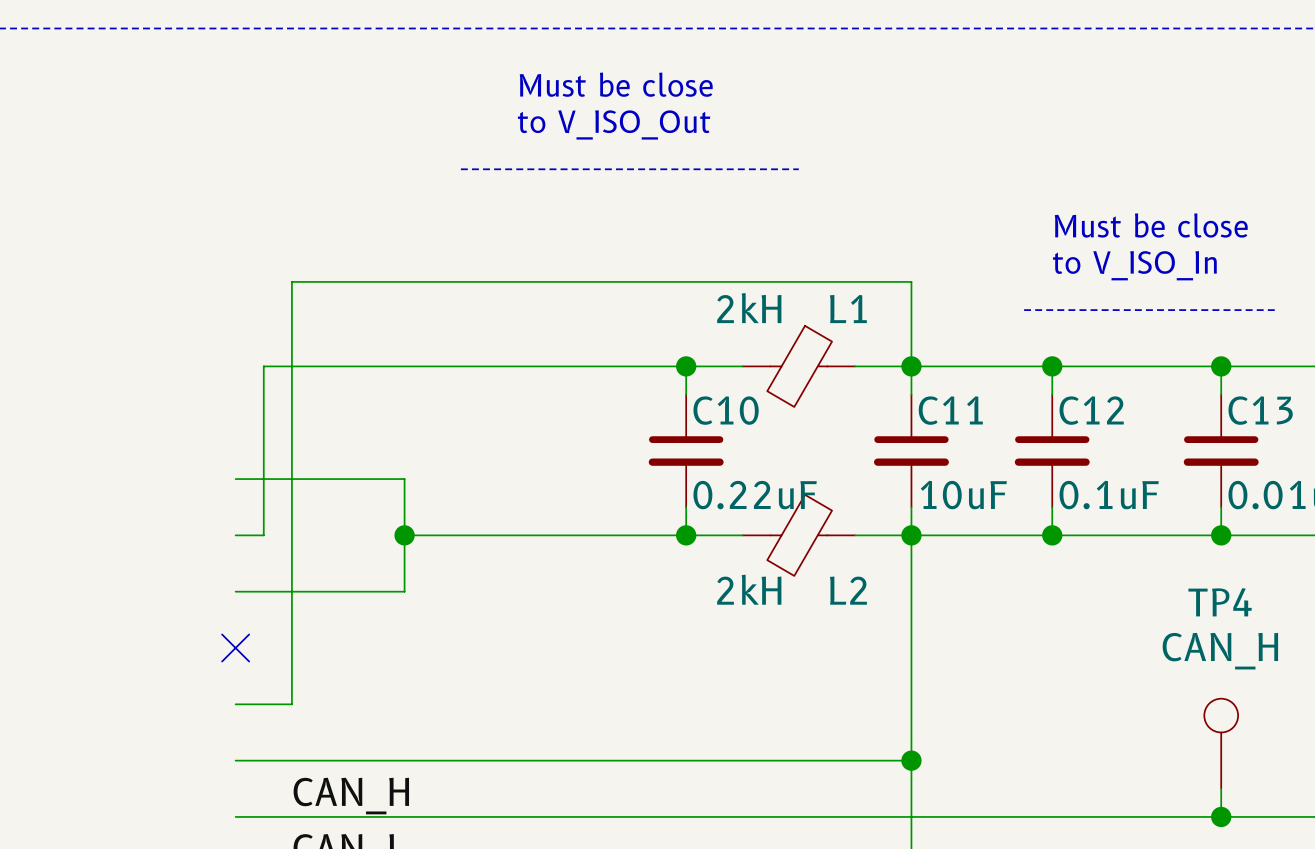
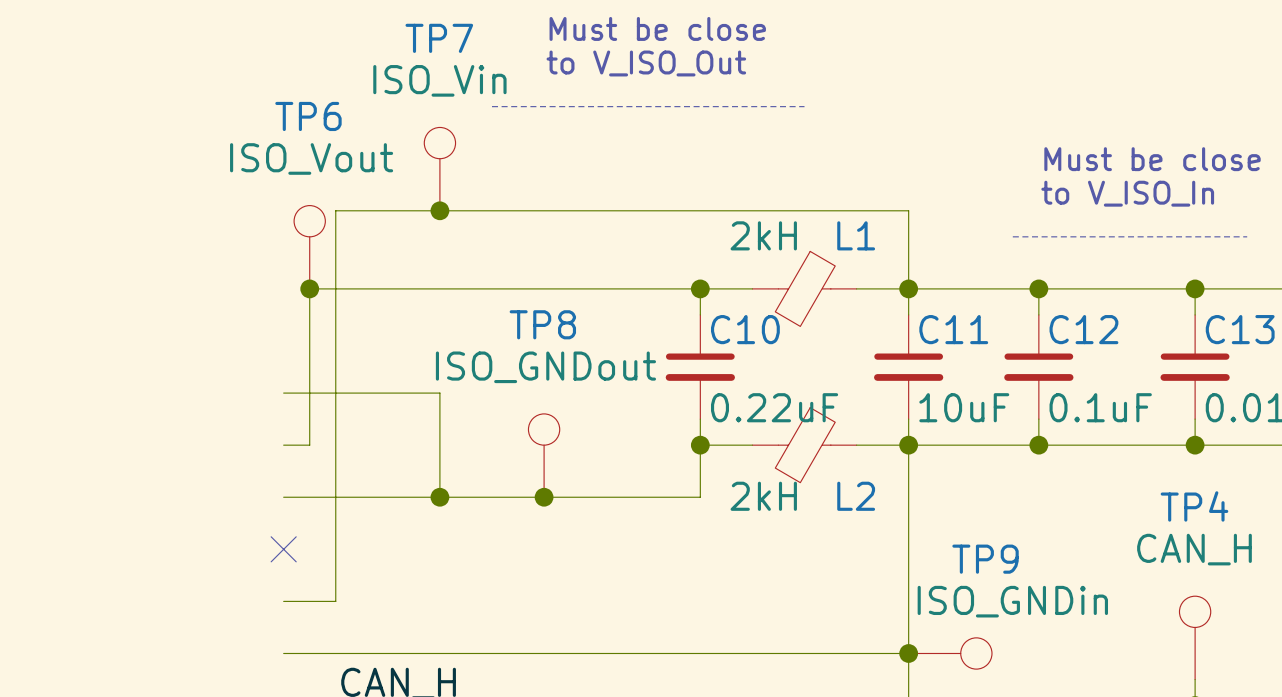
TP7: none -> ISO_Vin (439, 169)
junction: none -> (439, 210)
TP6: none -> ISO_Vout (309, 247)
junction: none -> (309, 288)
wire: (404, 535) (686, 535) -> (439, 497) (700, 497) (700, 445)
junction position: (404, 535) -> (439, 497)
TP8: none -> ISO_GNDout (544, 455)
junction: none -> (544, 497)
TP9: none -> ISO_GNDin (950, 653)

